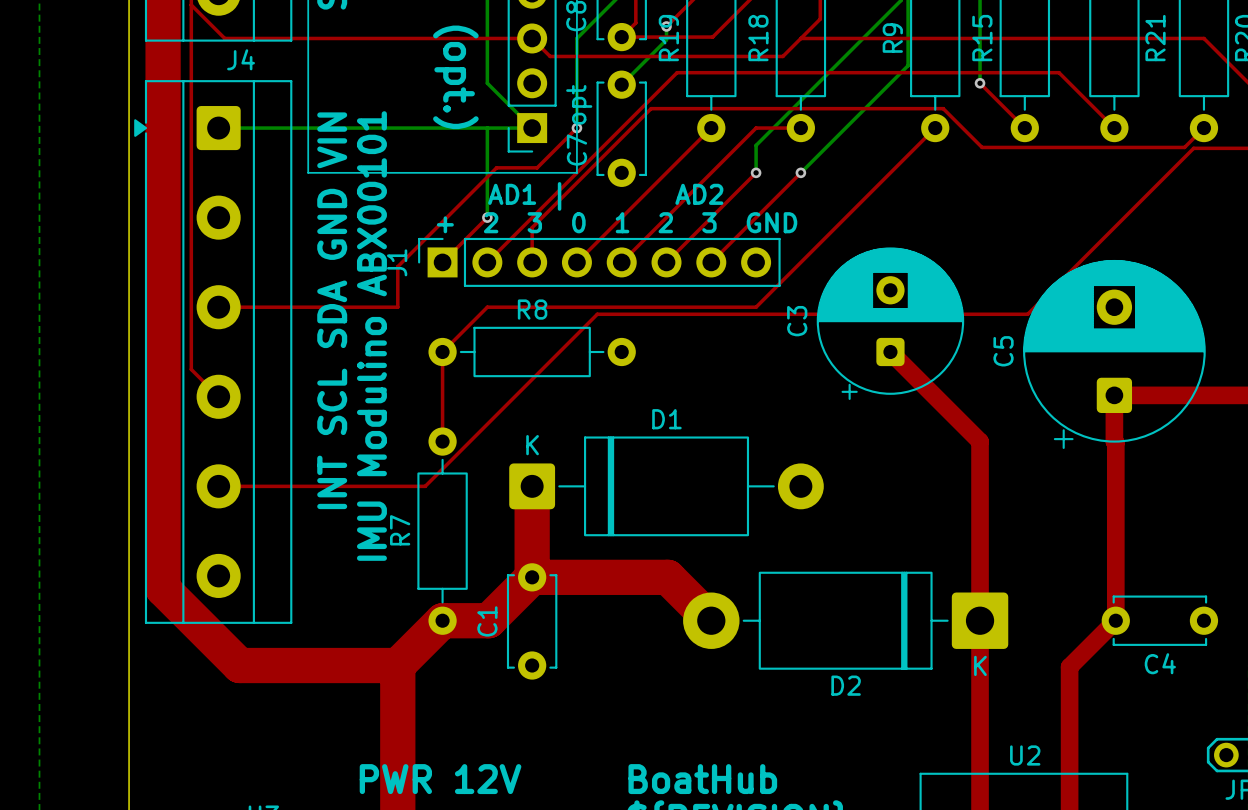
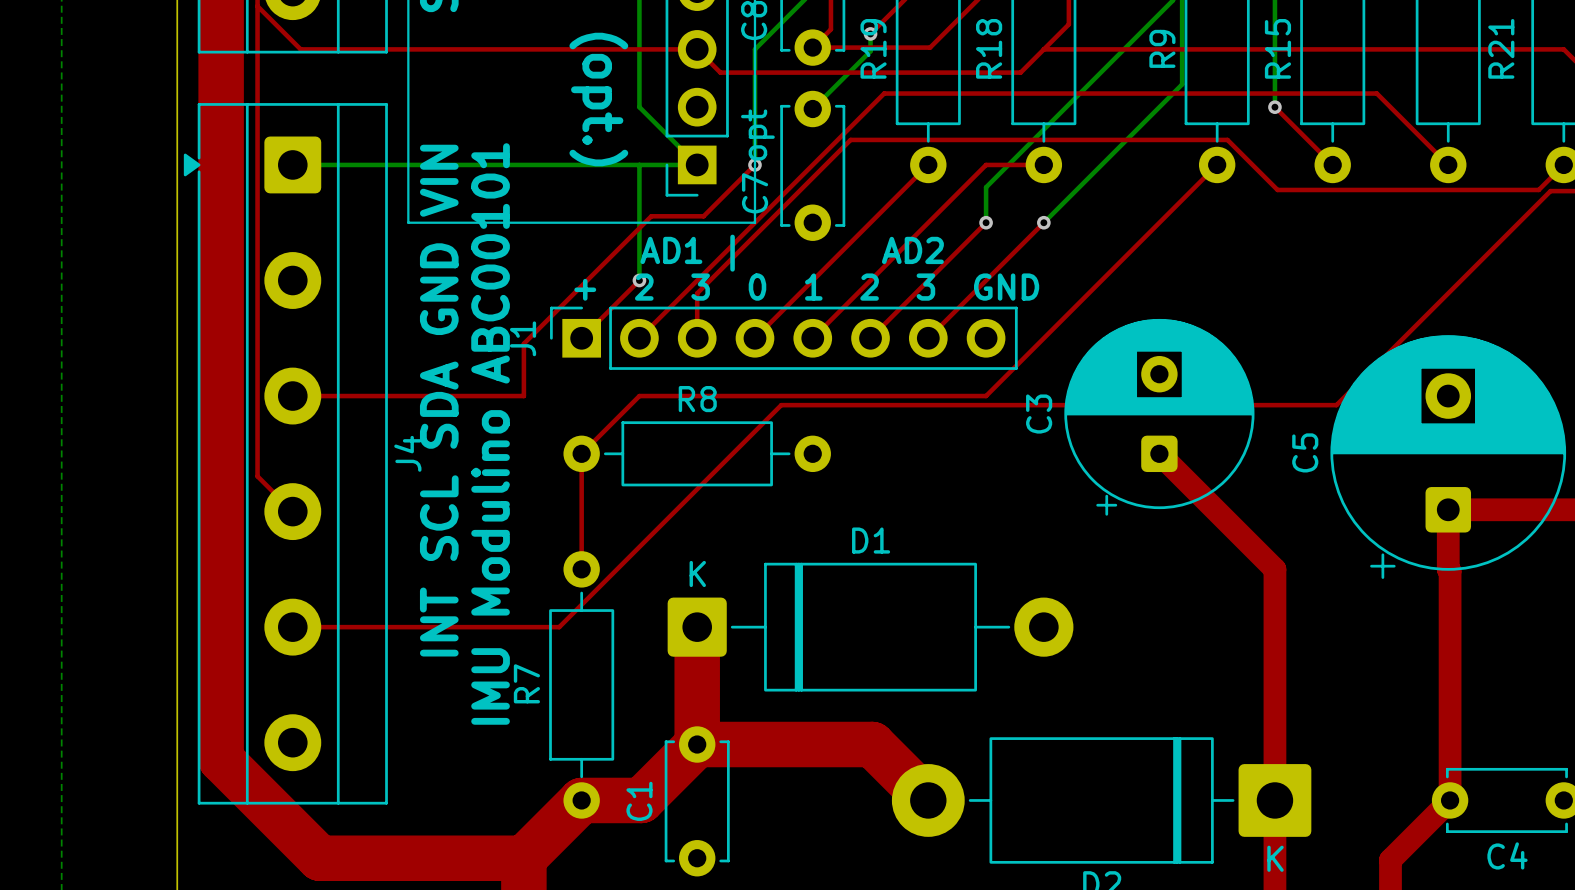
J4 name rotation: 0° (241, 59) -> 90° counterclockwise (407, 453)
J4 name position: J4 (241, 59) -> J4 (407, 453)
text: IMU Modulino ABX00101 (371, 336) -> IMU Modulino ABC00101 (490, 433)

